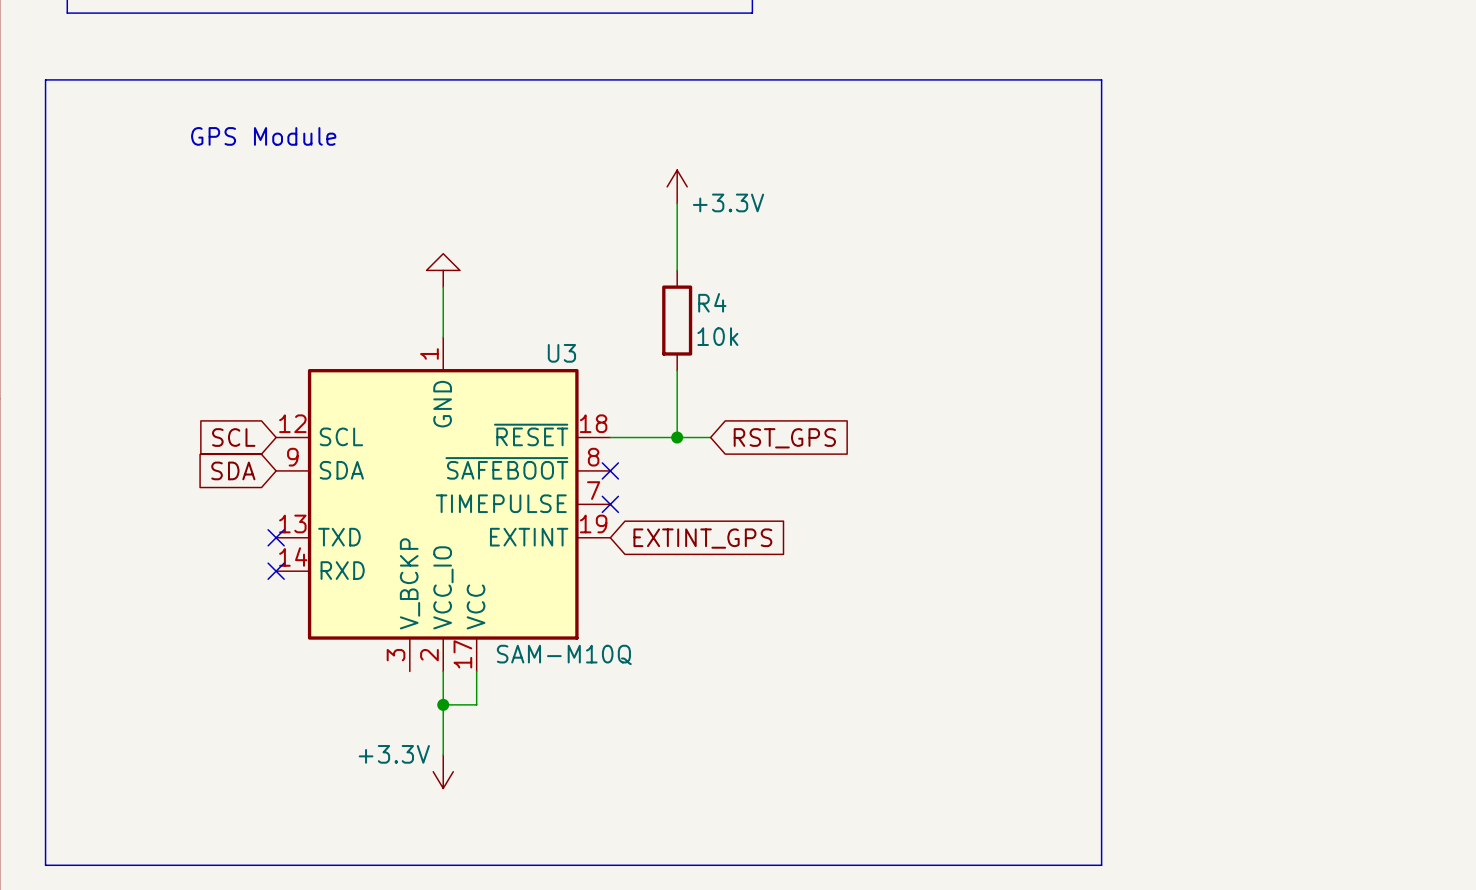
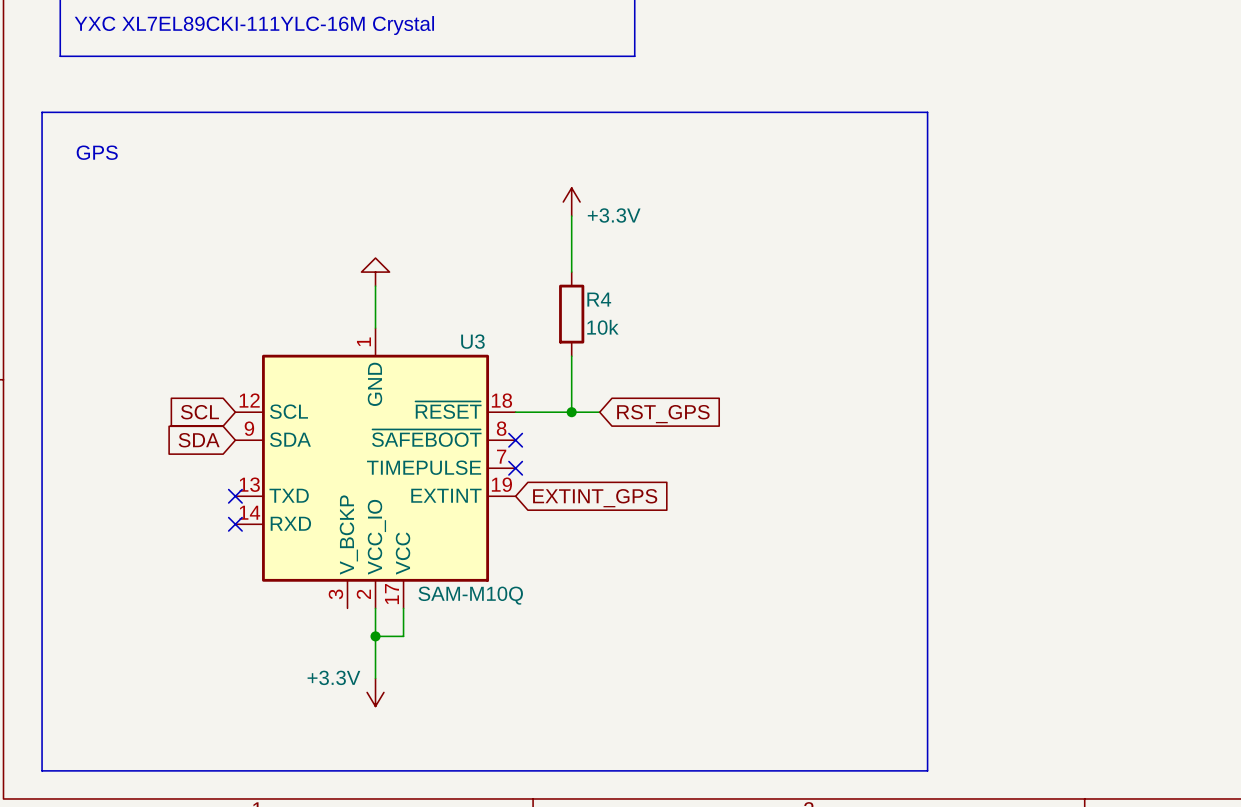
text: none -> GPS (97, 152)
text: GPS Module (263, 136) -> none

